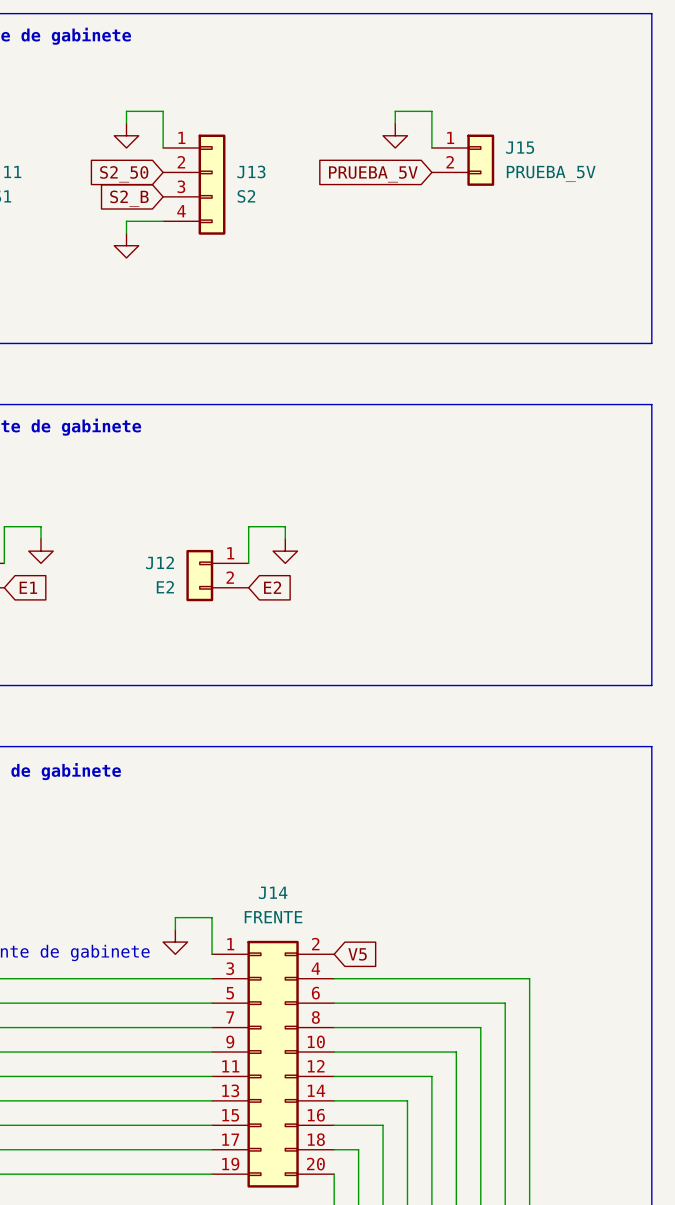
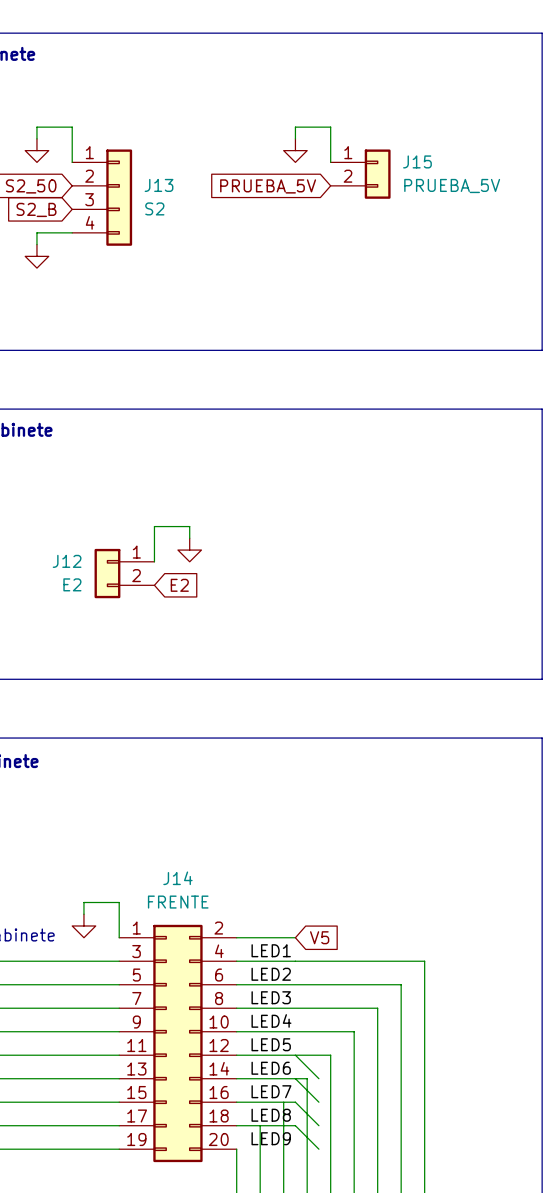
wire: none -> (236, 937) (295, 937)
global label position: V5 (357, 954) -> V5 (319, 937)
label: none -> LED1 (271, 950)
label: none -> LED2 (271, 974)
label: none -> LED3 (271, 997)
label: none -> LED4 (271, 1020)
label: none -> LED5 (271, 1044)
wire: none -> (295, 1055) (318, 1078)
label: none -> LED6 (271, 1068)
wire: none -> (295, 1078) (318, 1102)
label: none -> LED7 (271, 1091)
wire: none -> (283, 1102) (295, 1102) (318, 1125)
label: none -> LED8 (271, 1115)
wire: none -> (260, 1125) (295, 1125) (318, 1149)
label: none -> LED9 (271, 1138)

